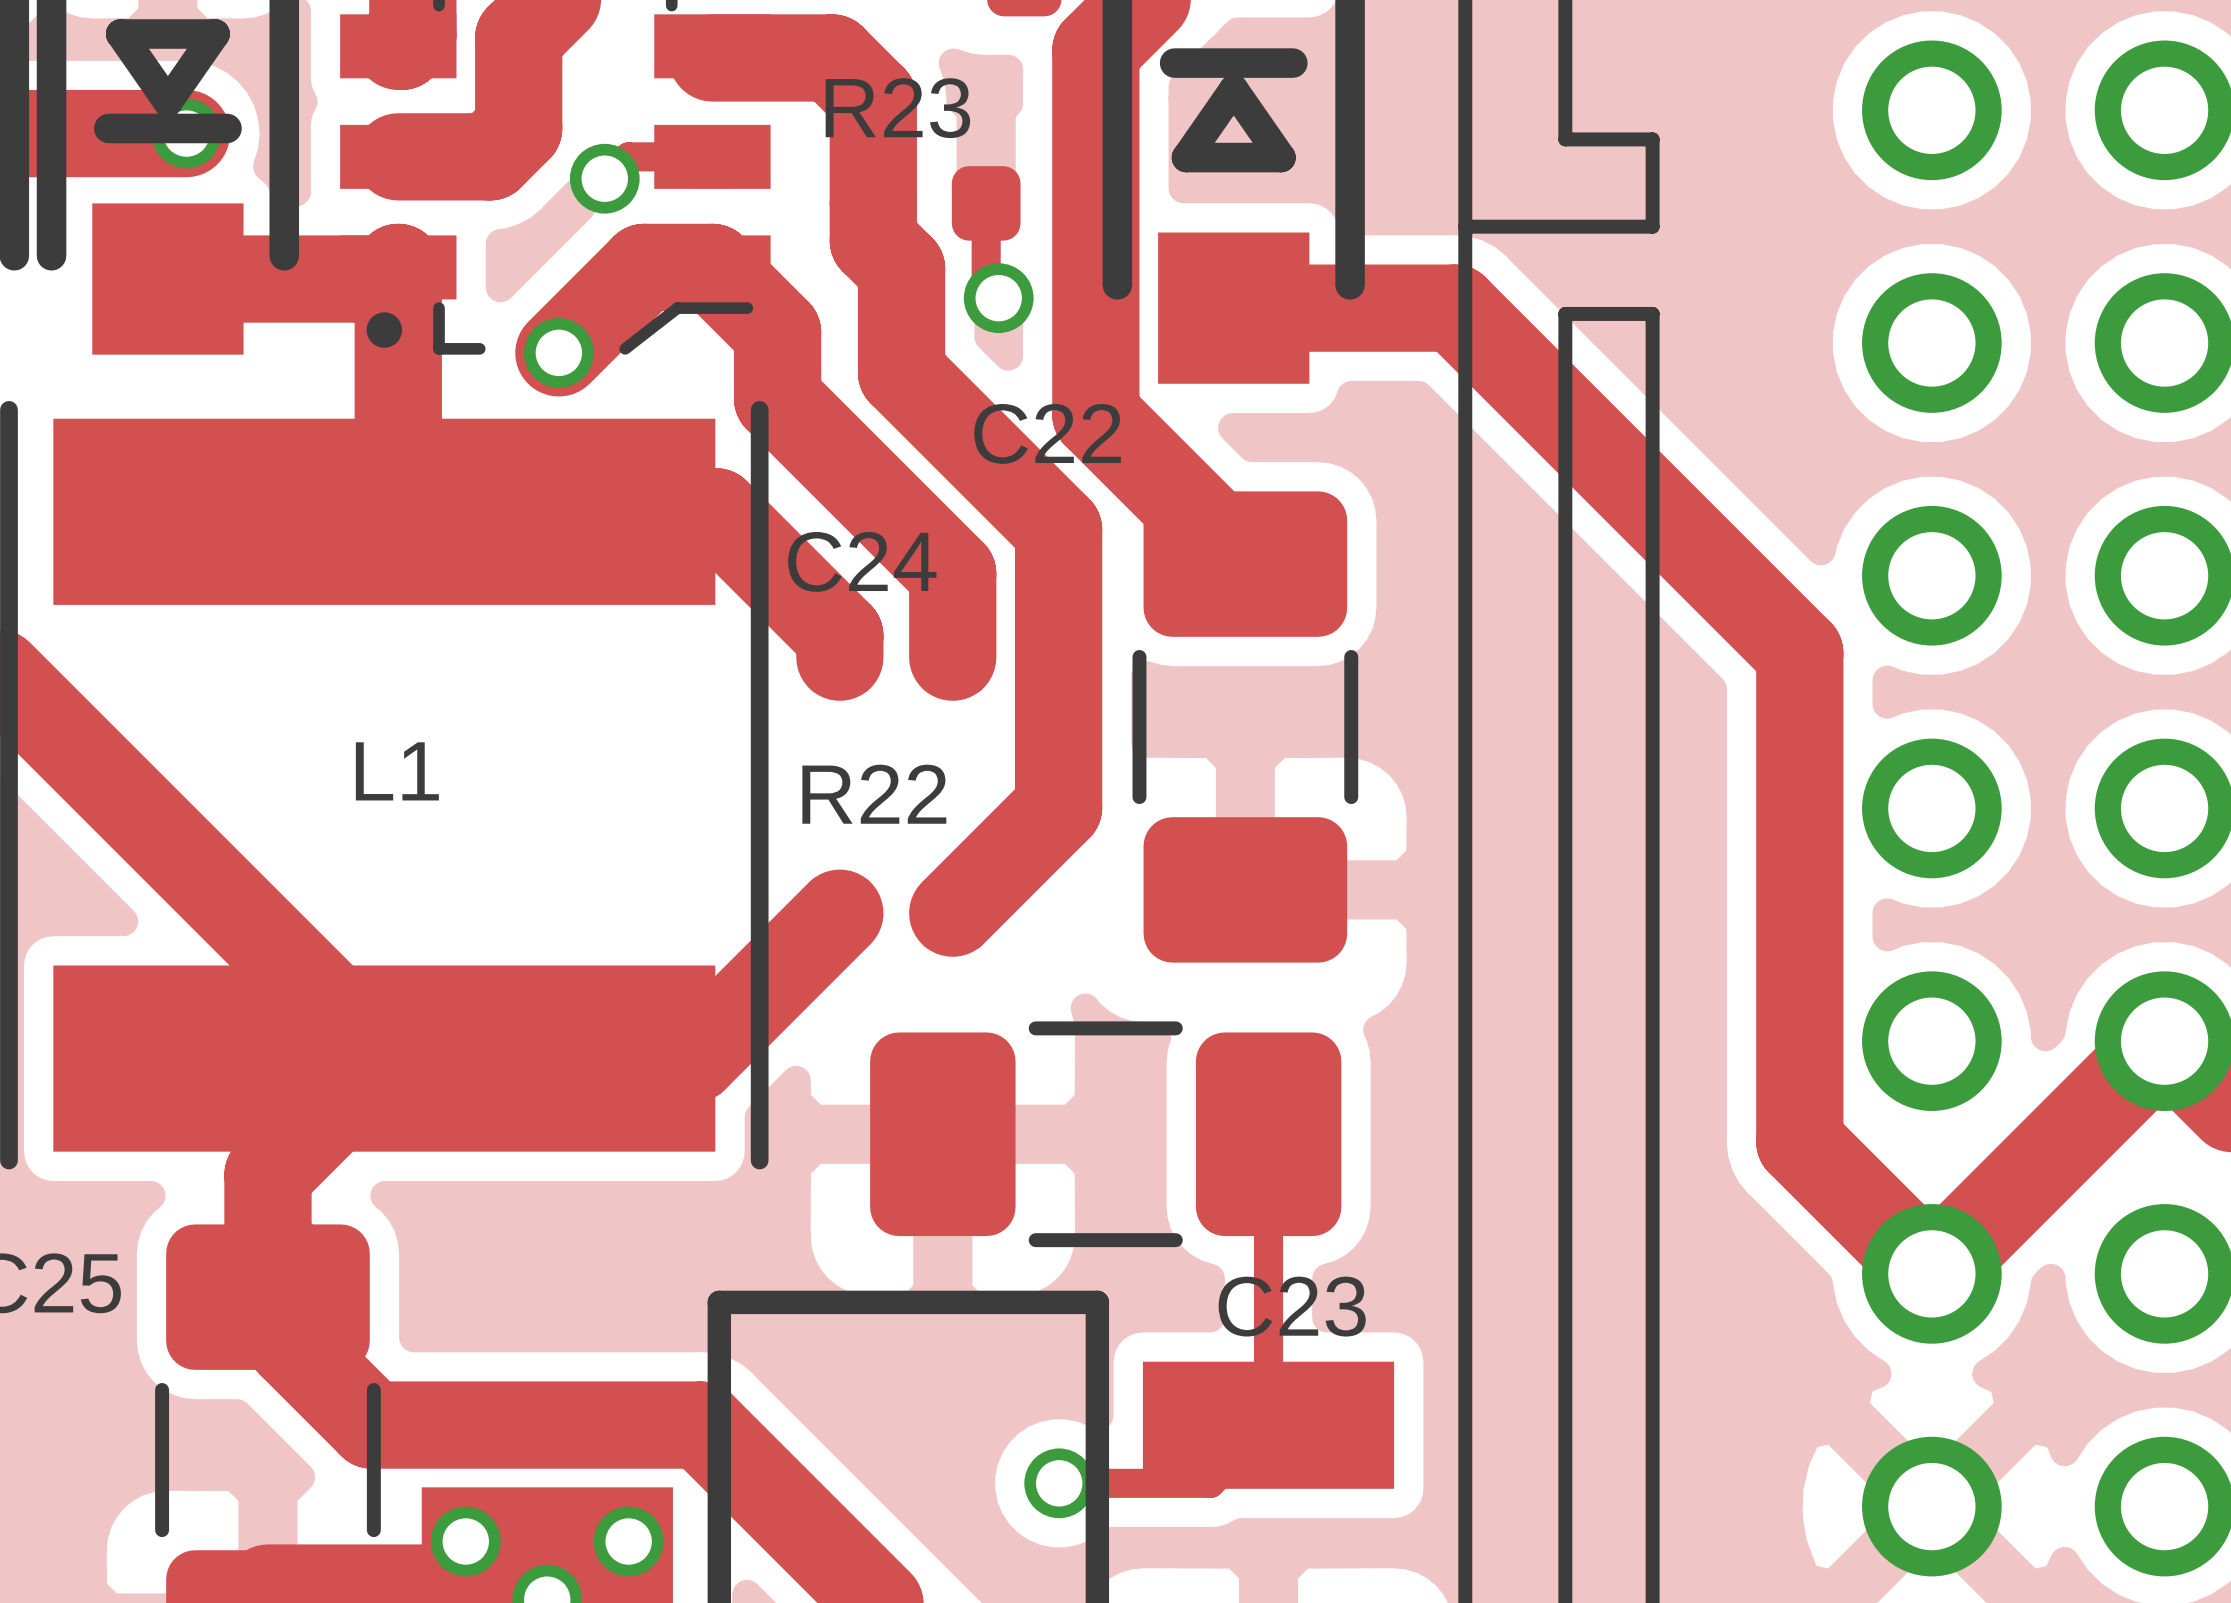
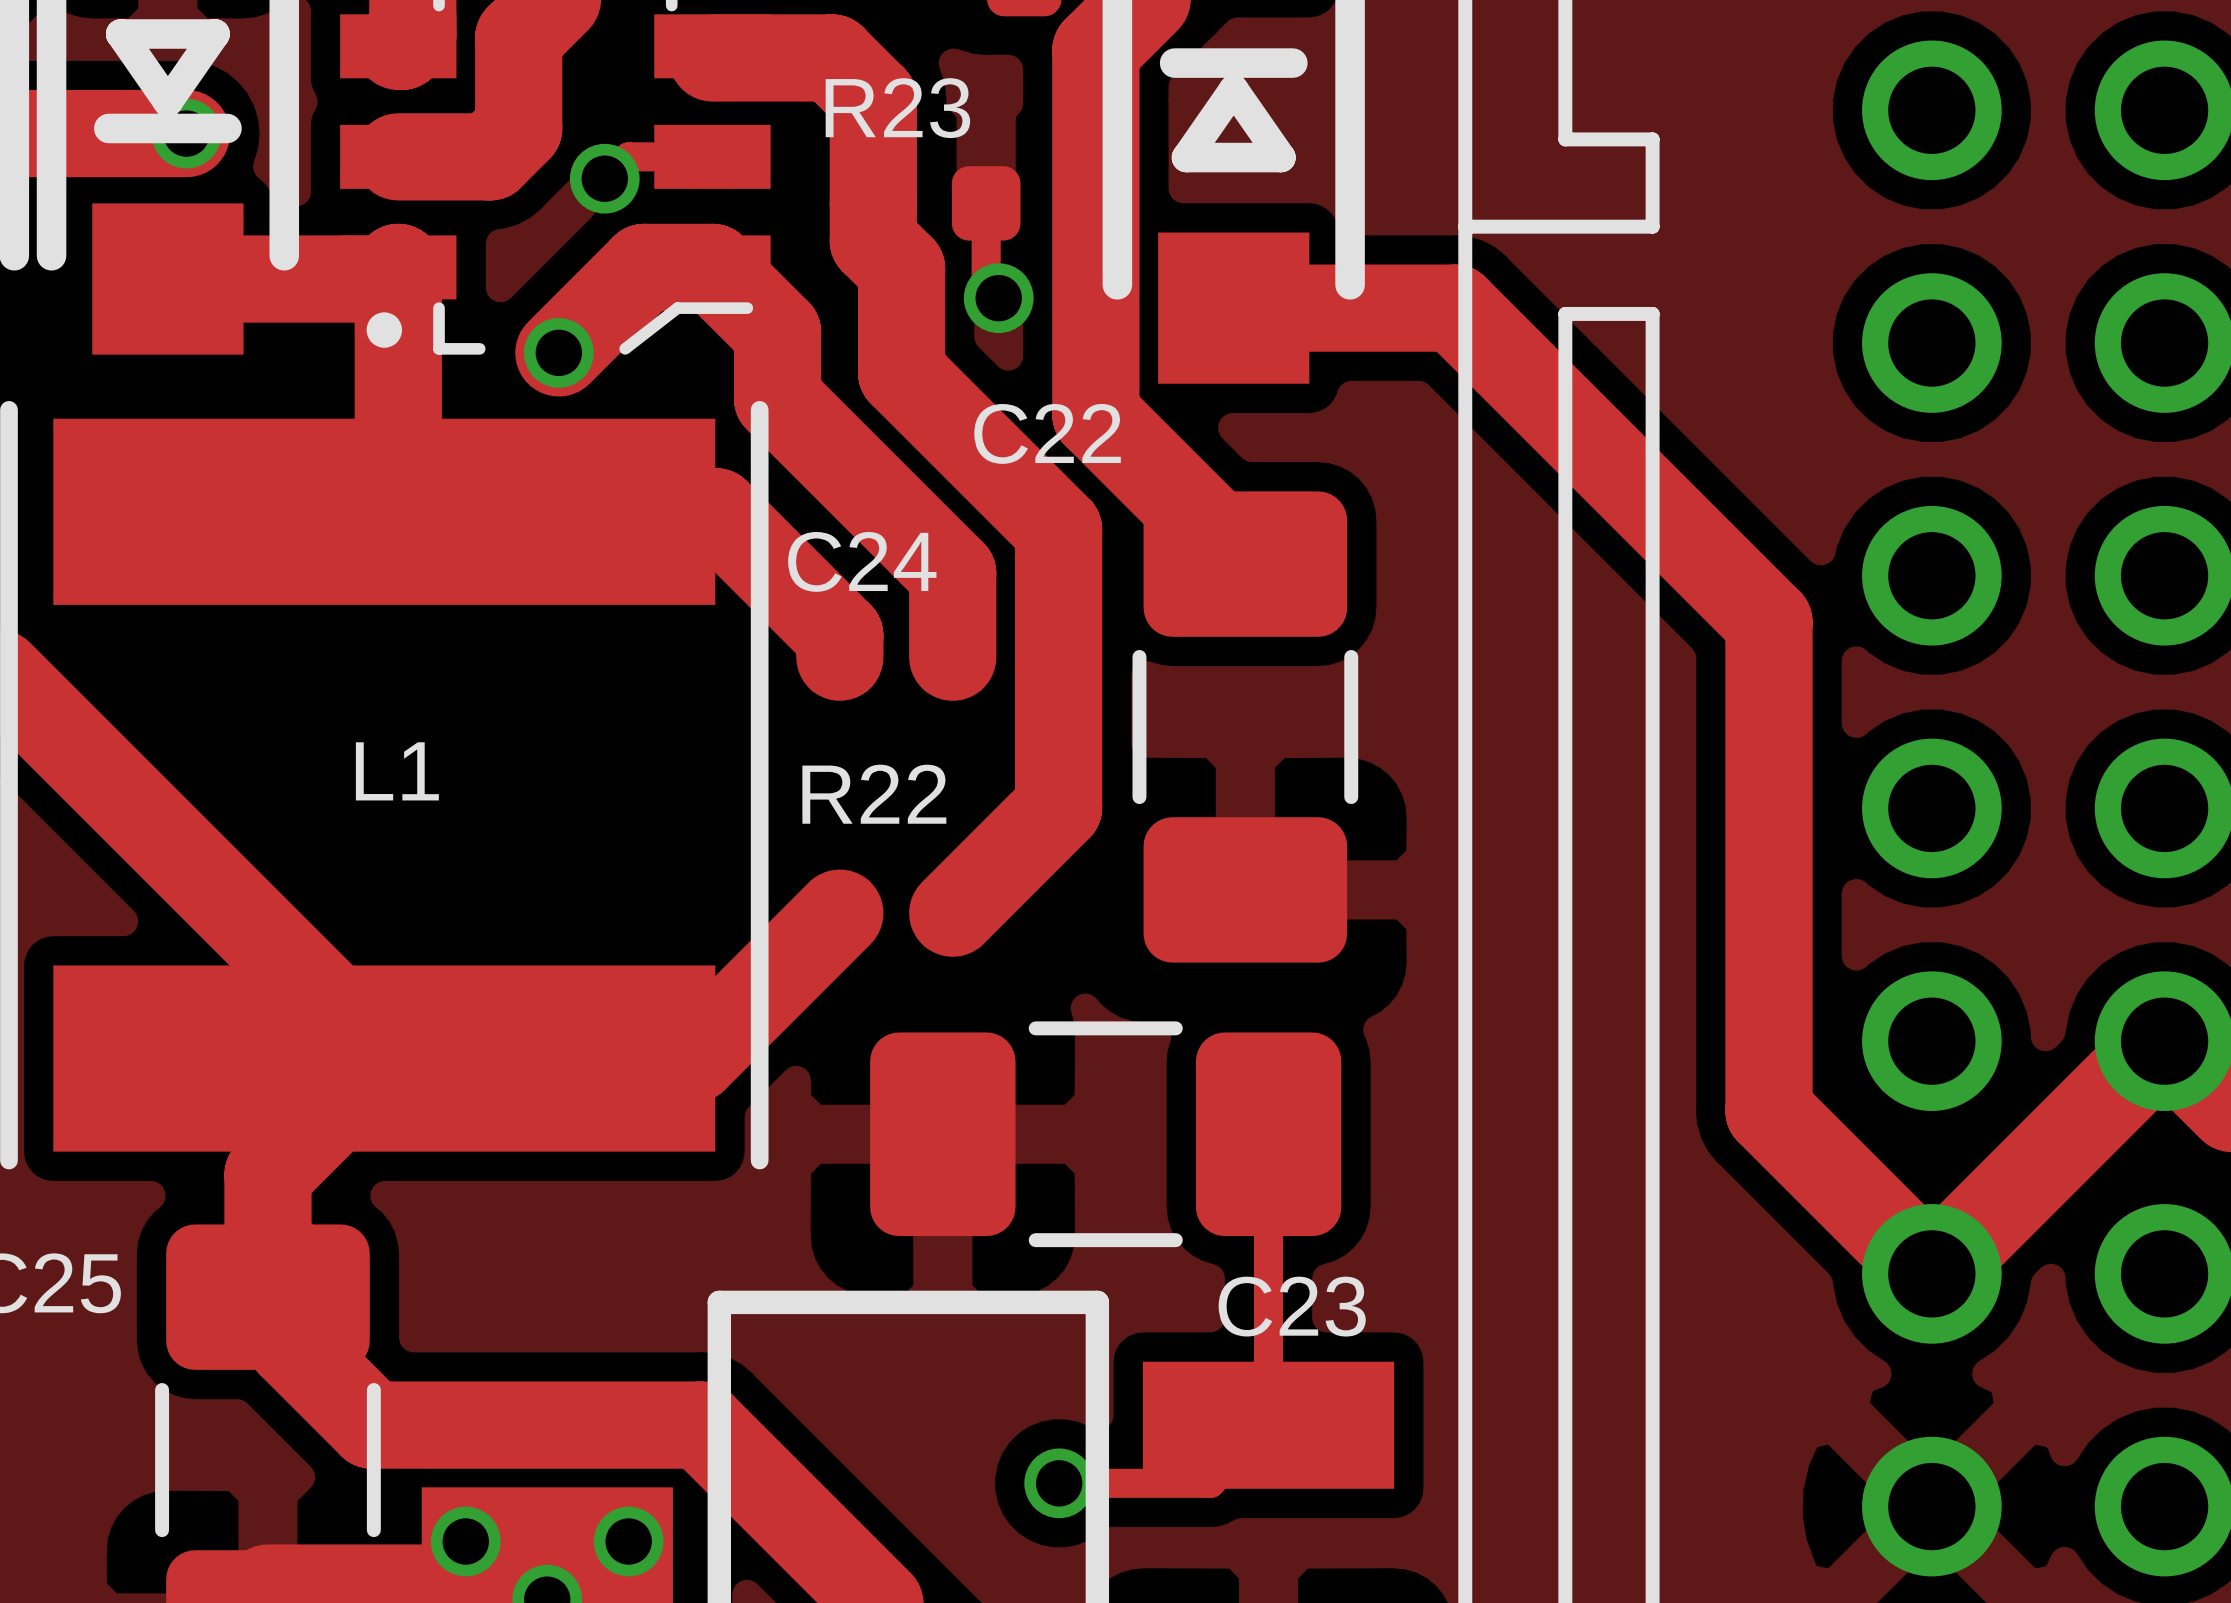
track: (1768, 622) (1799, 653) (1799, 1141) -> (1768, 622) (1768, 1110) (1799, 1141)

